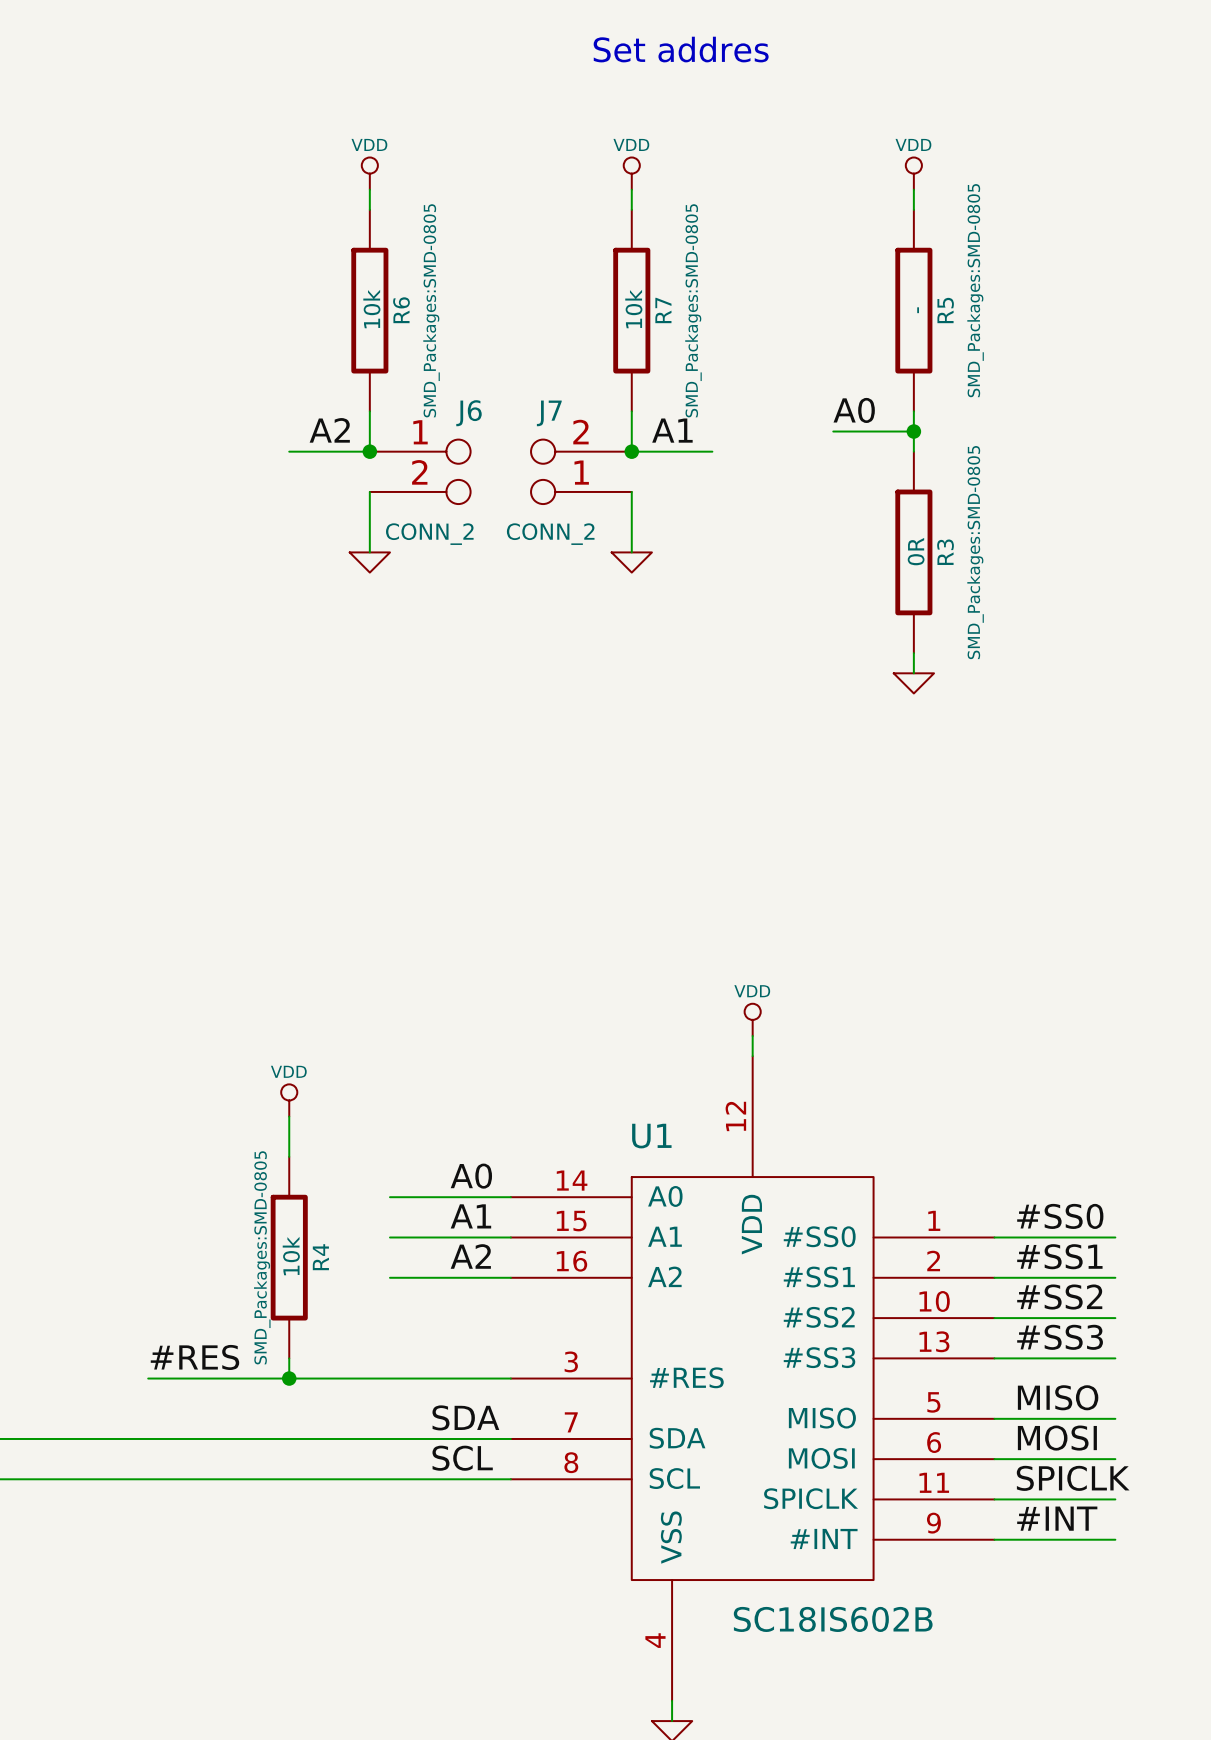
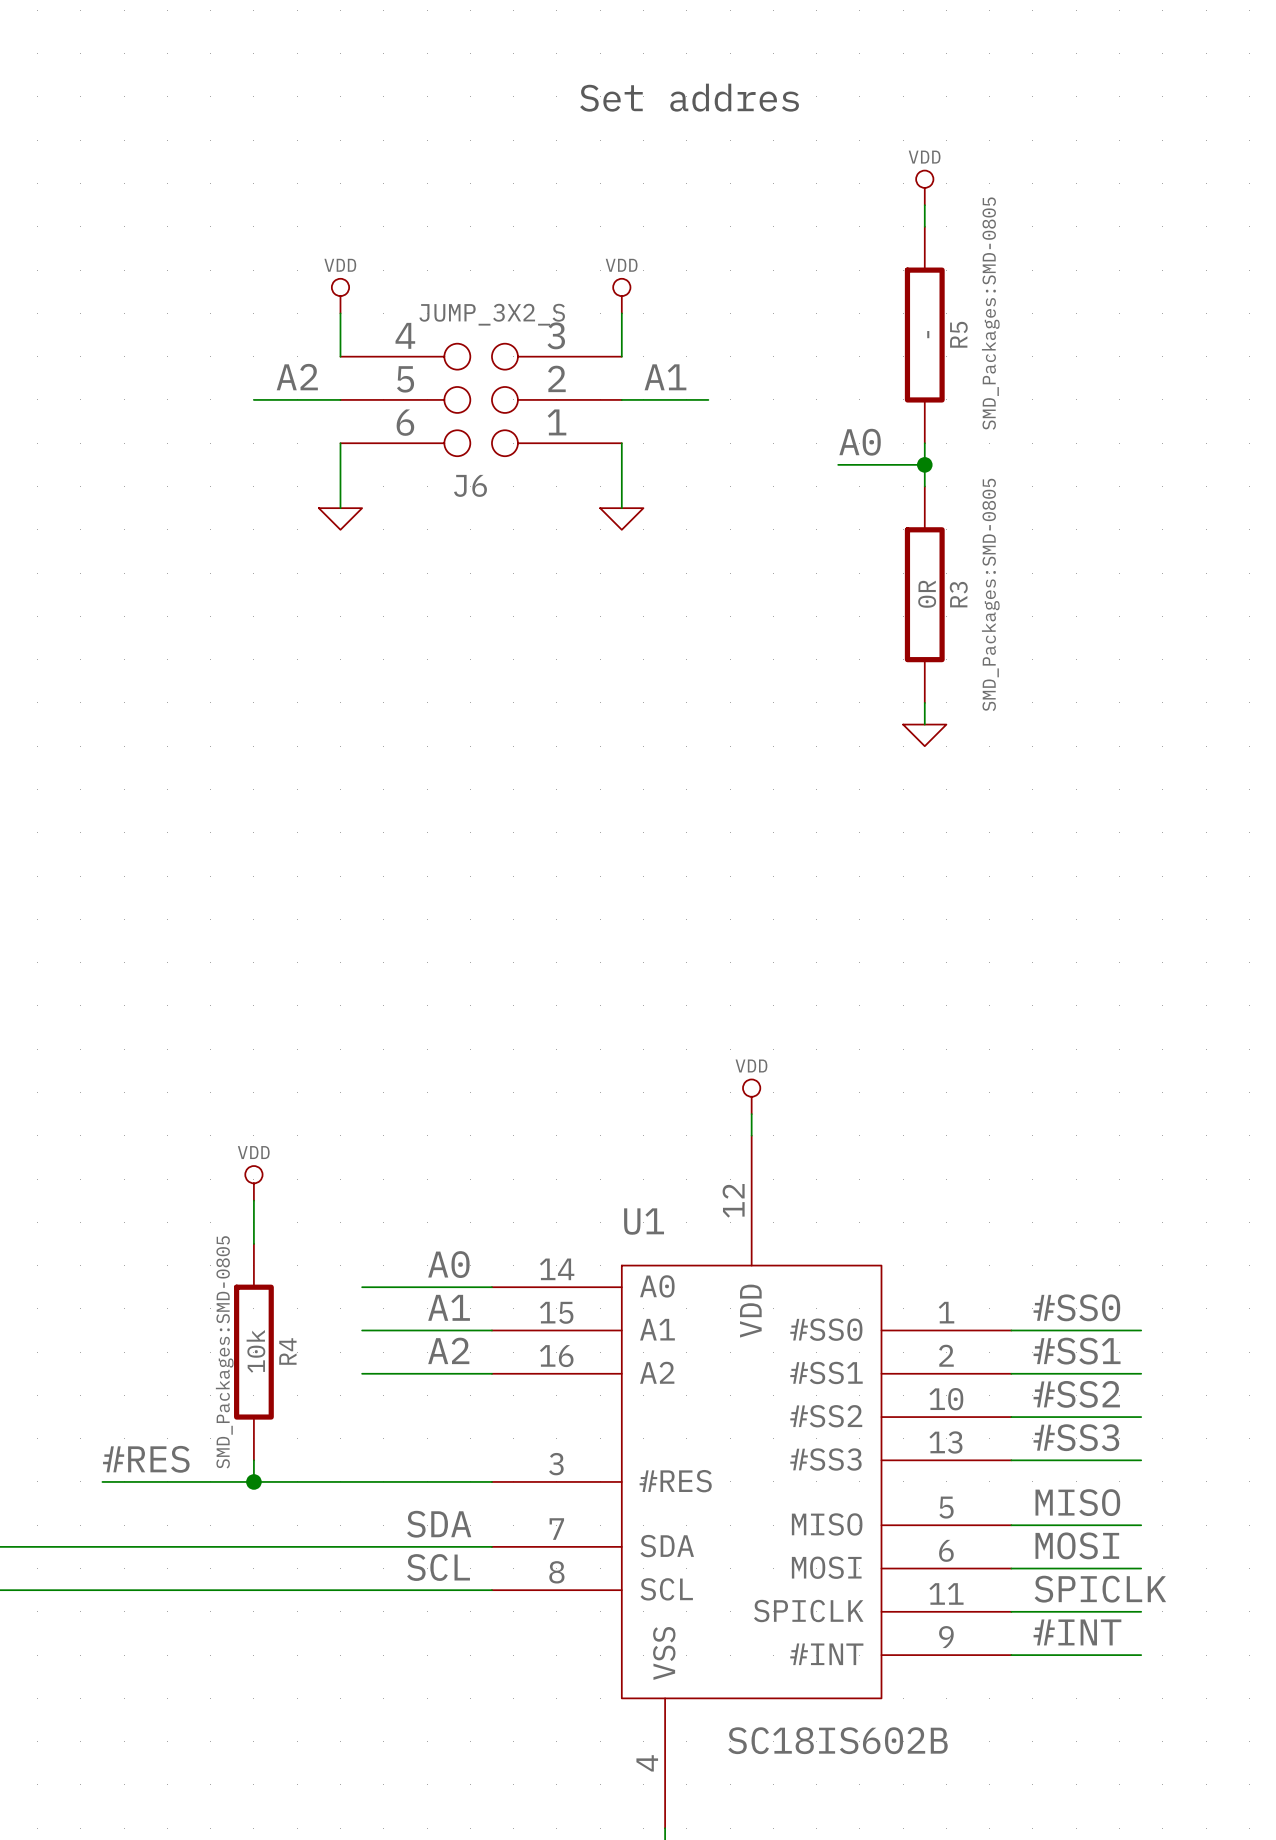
text position: Set addres (681, 49) -> Set addres (689, 97)
power symbol position: VDD (369, 173) -> VDD (340, 296)
power symbol position: VDD (631, 173) -> VDD (621, 296)
wire: (369, 189) (369, 209) -> none
wire: (631, 189) (631, 209) -> none
wire: none -> (340, 313) (340, 356)
wire: none -> (621, 313) (621, 356)
R6: 10k (369, 310) -> none
R7: 10k (631, 310) -> none
wire: none -> (253, 399) (340, 399)
wire: none -> (621, 399) (708, 399)
J6 name position: J6 (469, 413) -> J6 (470, 485)
label position: A2 (329, 430) -> A2 (297, 377)
label position: A1 (672, 430) -> A1 (665, 377)
J6 symbol: [369, 439, 471, 505] -> [340, 343, 622, 457]
wire: (289, 451) (369, 451) -> (340, 508) (340, 486)
junction: (369, 451) -> none
wire: (631, 451) (712, 451) -> (621, 486) (621, 508)
junction: (631, 451) -> none
J7: CONN_2 (581, 471) -> none
wire: (369, 491) (369, 552) -> none
wire: (631, 491) (631, 552) -> none
J6 value: CONN_2 (550, 534) -> JUMP_3X2_S (492, 314)
power symbol position: (369, 562) -> (340, 518)
power symbol position: (631, 562) -> (621, 518)

